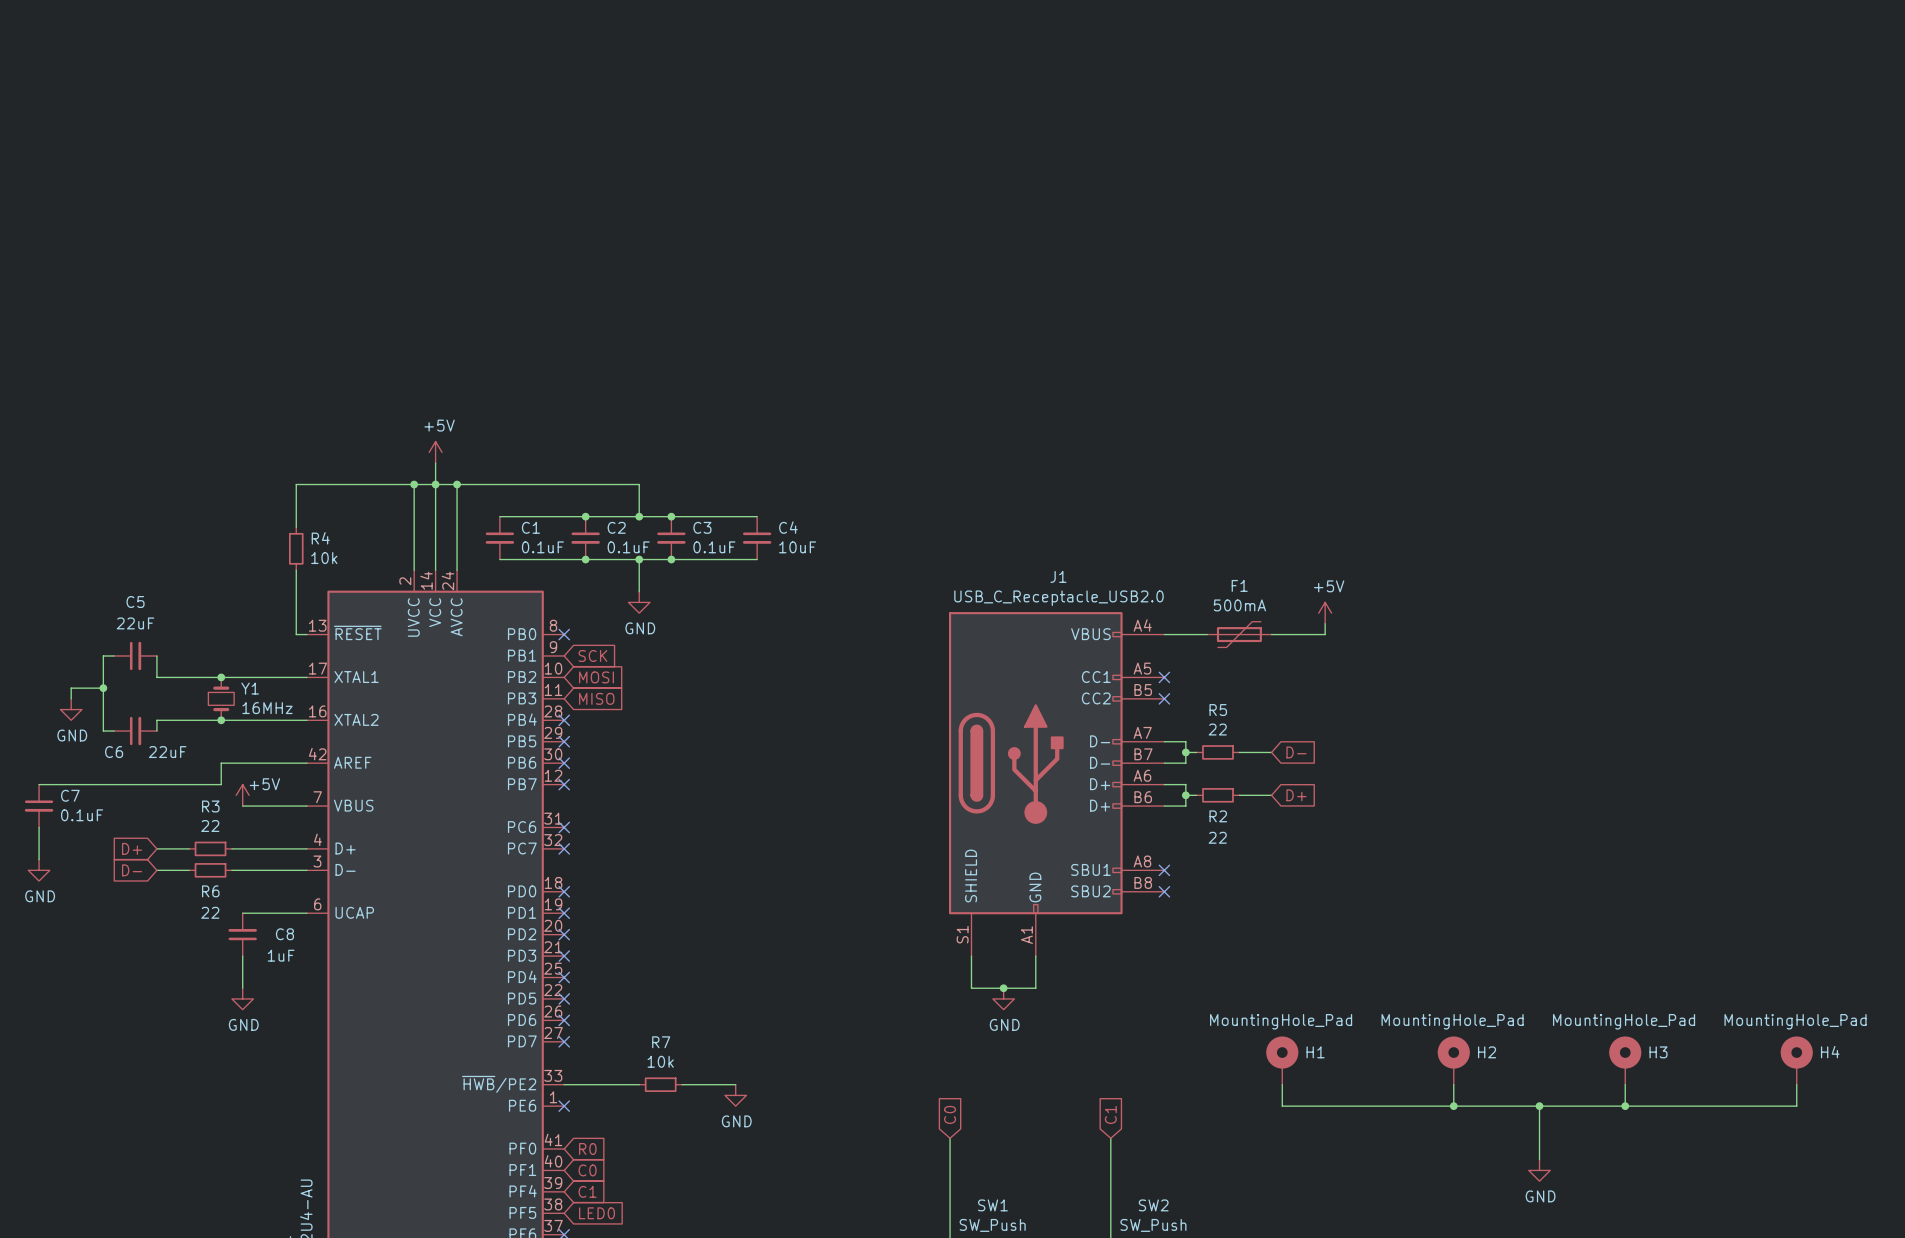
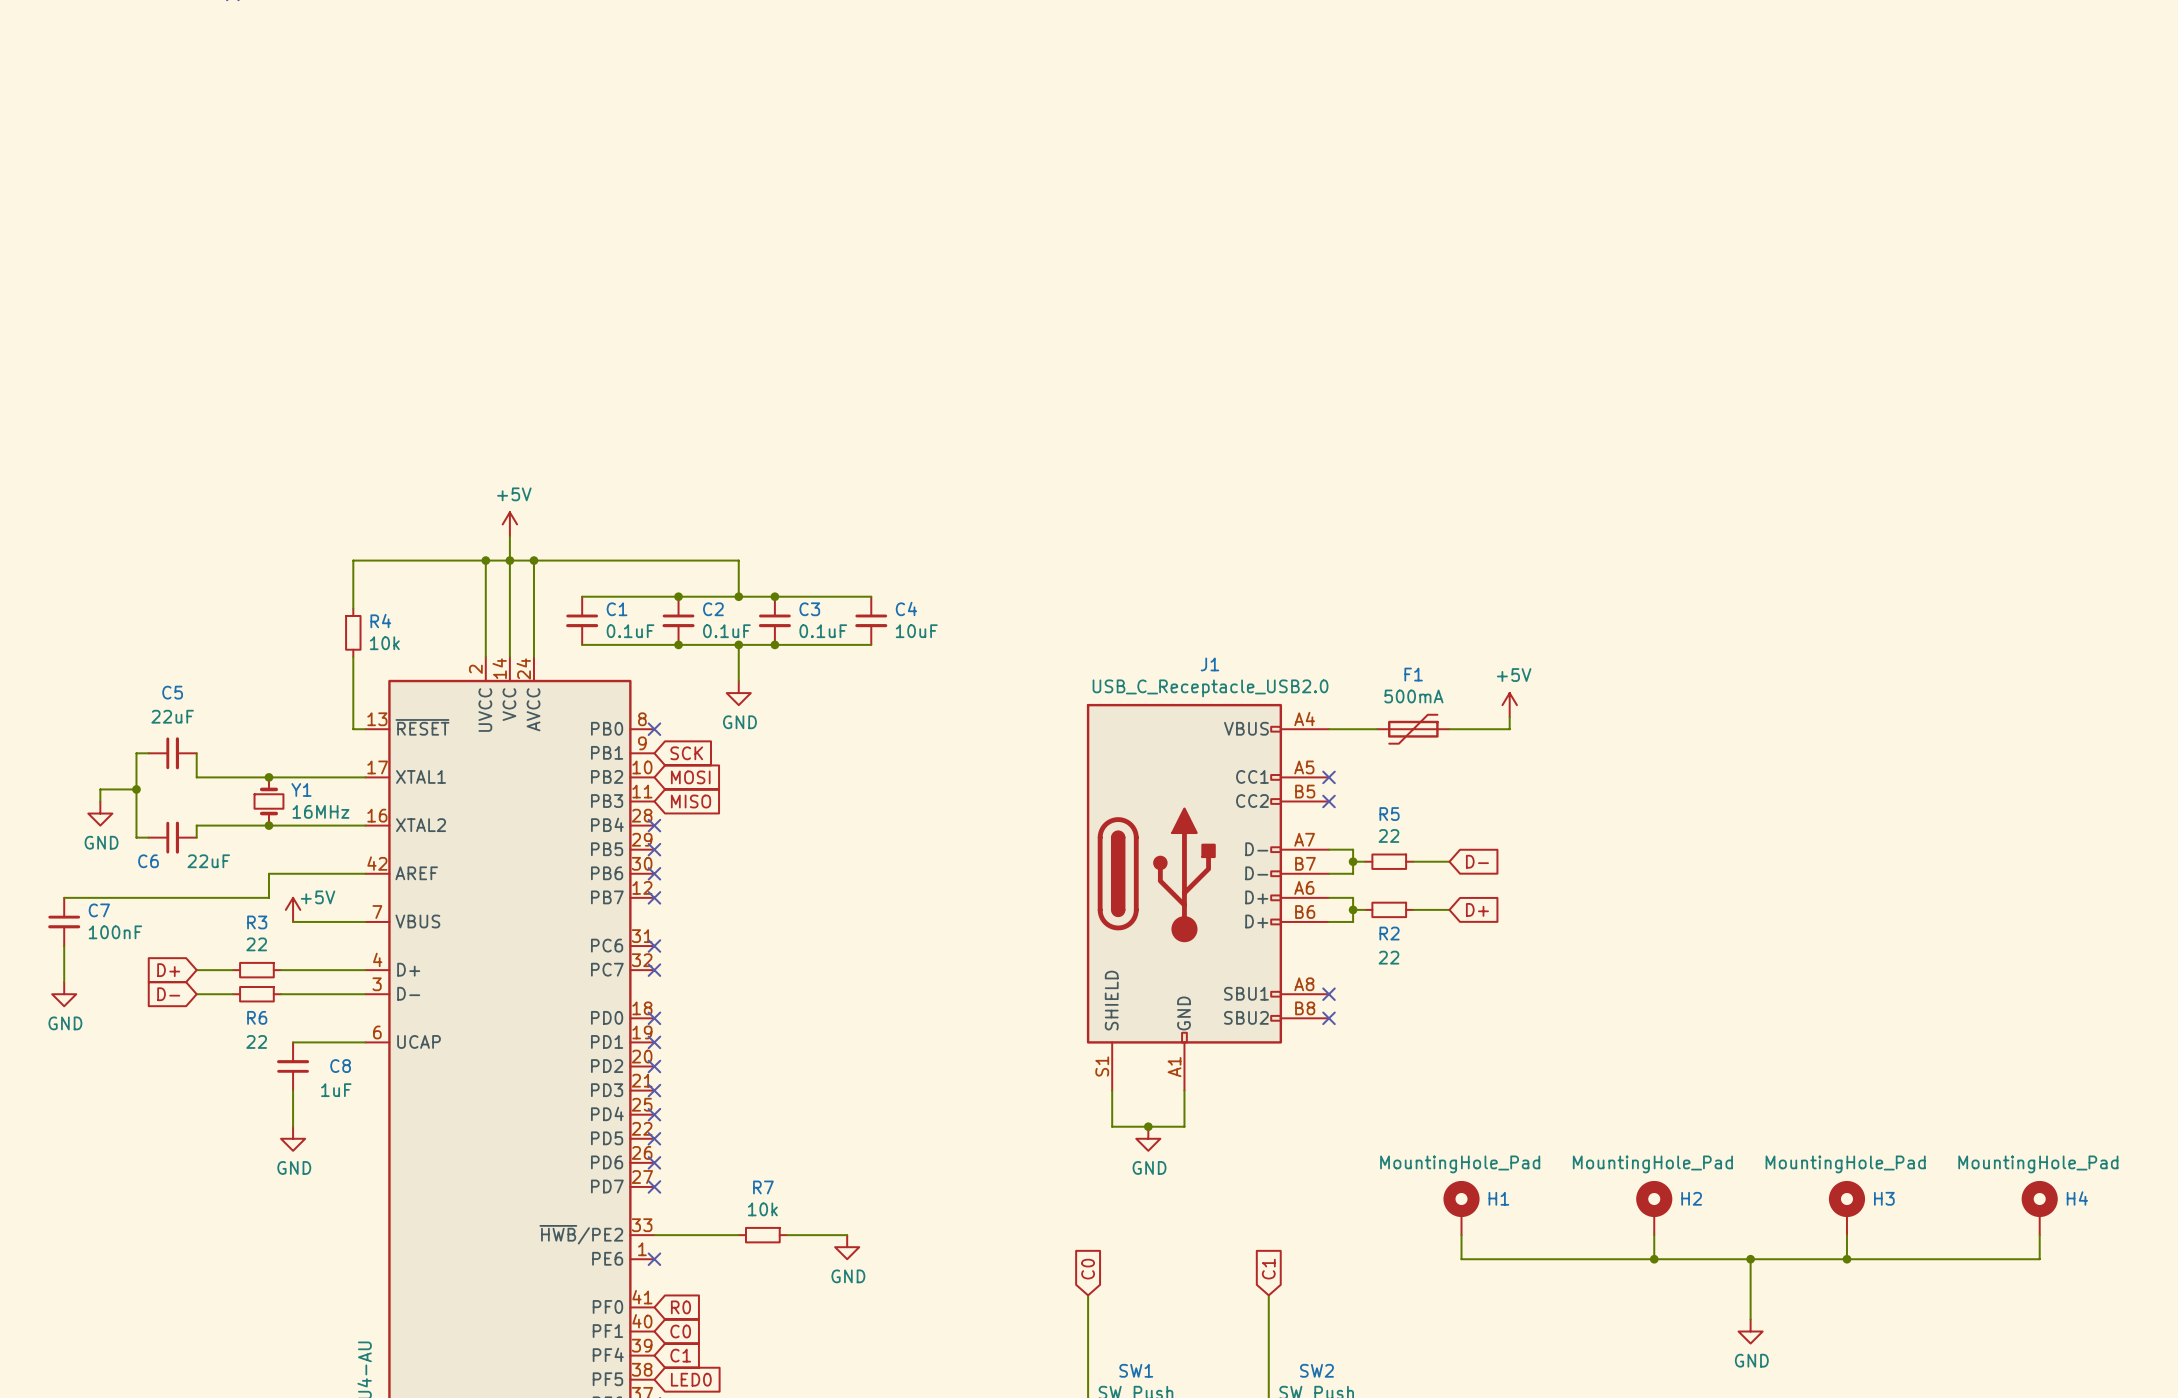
C7 value: 0.1uF (82, 815) -> 100nF (115, 932)

